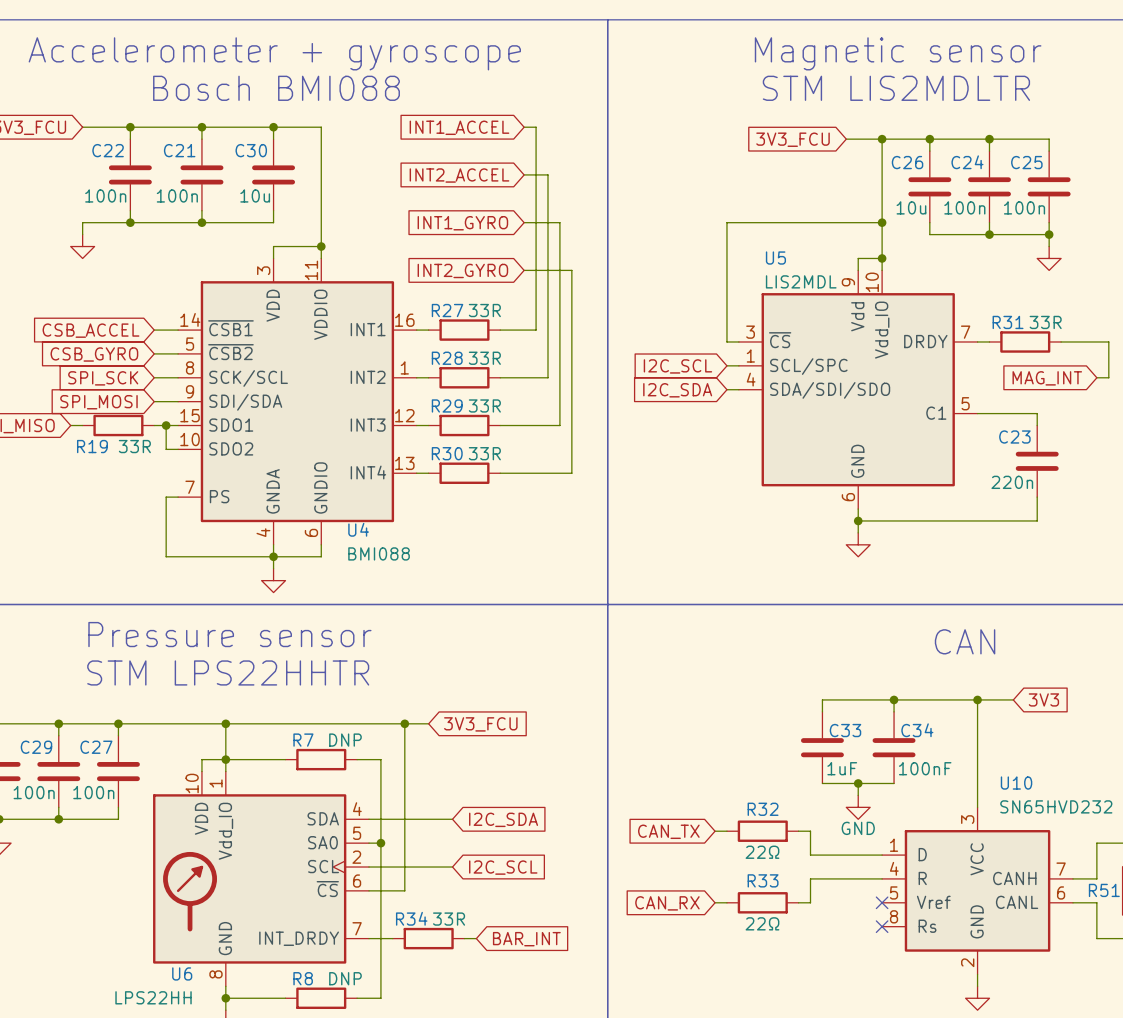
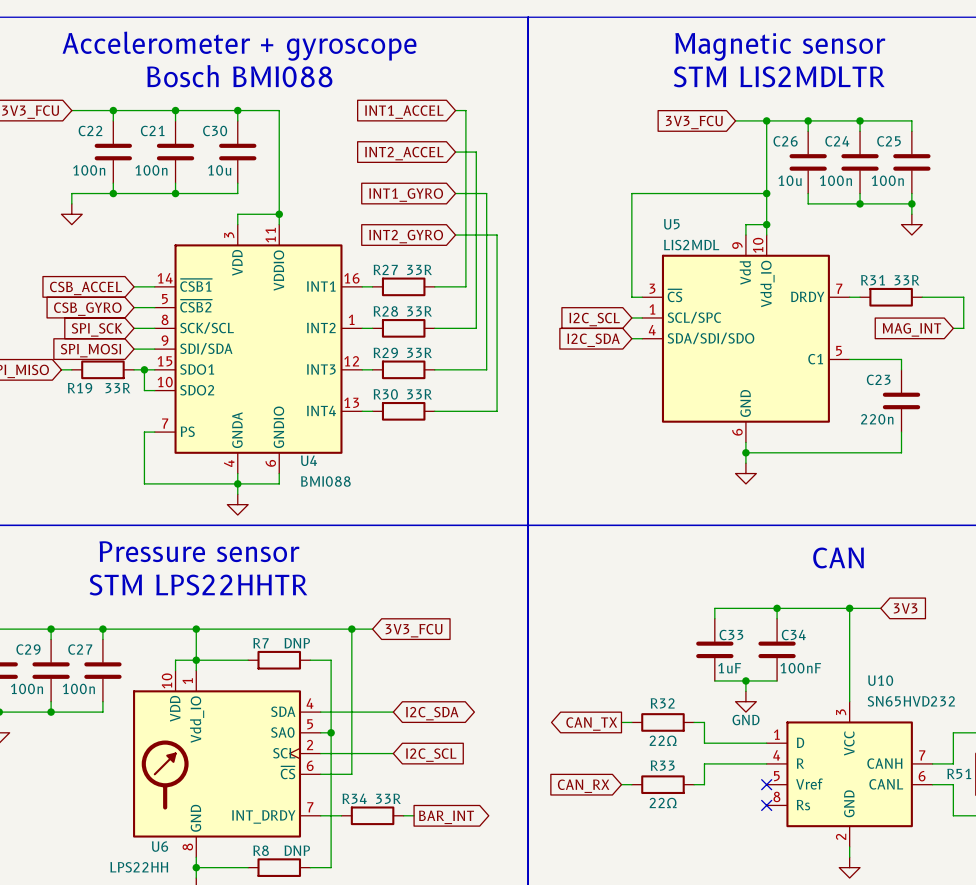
global label shape: input (503, 819) -> bidirectional (432, 713)
global label shape: input (668, 831) -> output (591, 724)
global label shape: input (526, 939) -> output (446, 817)

